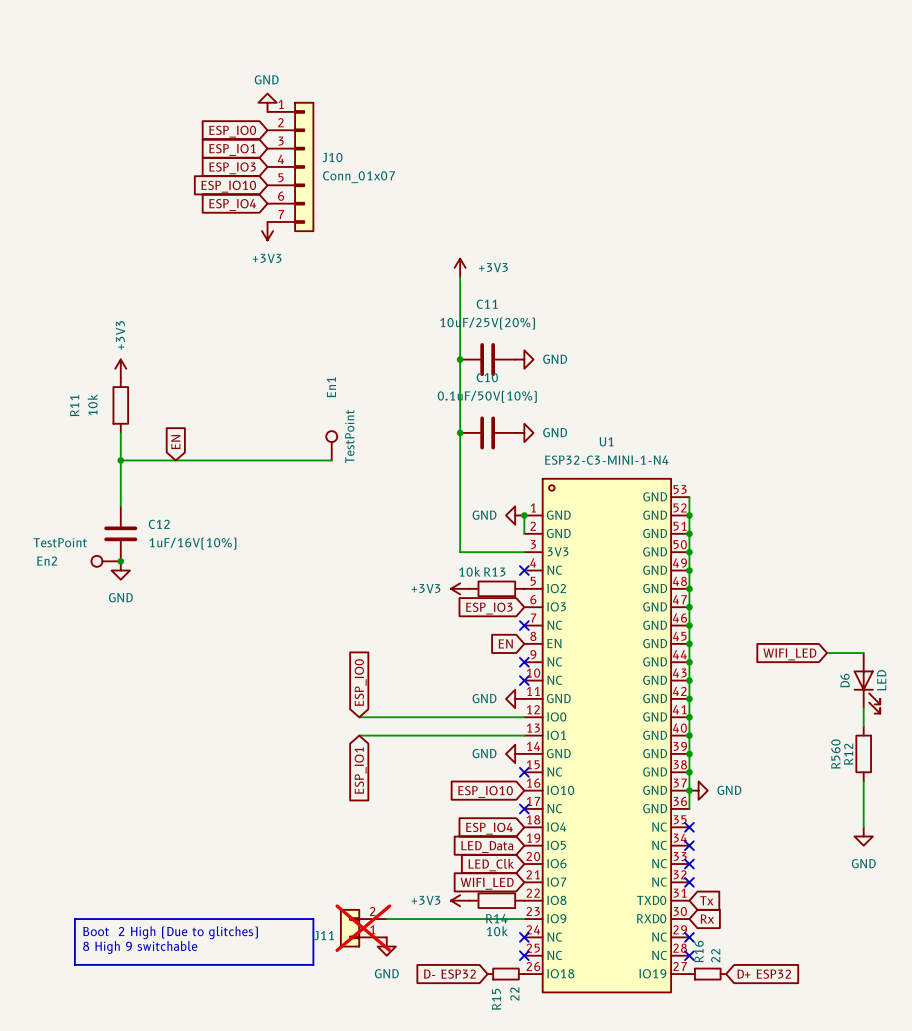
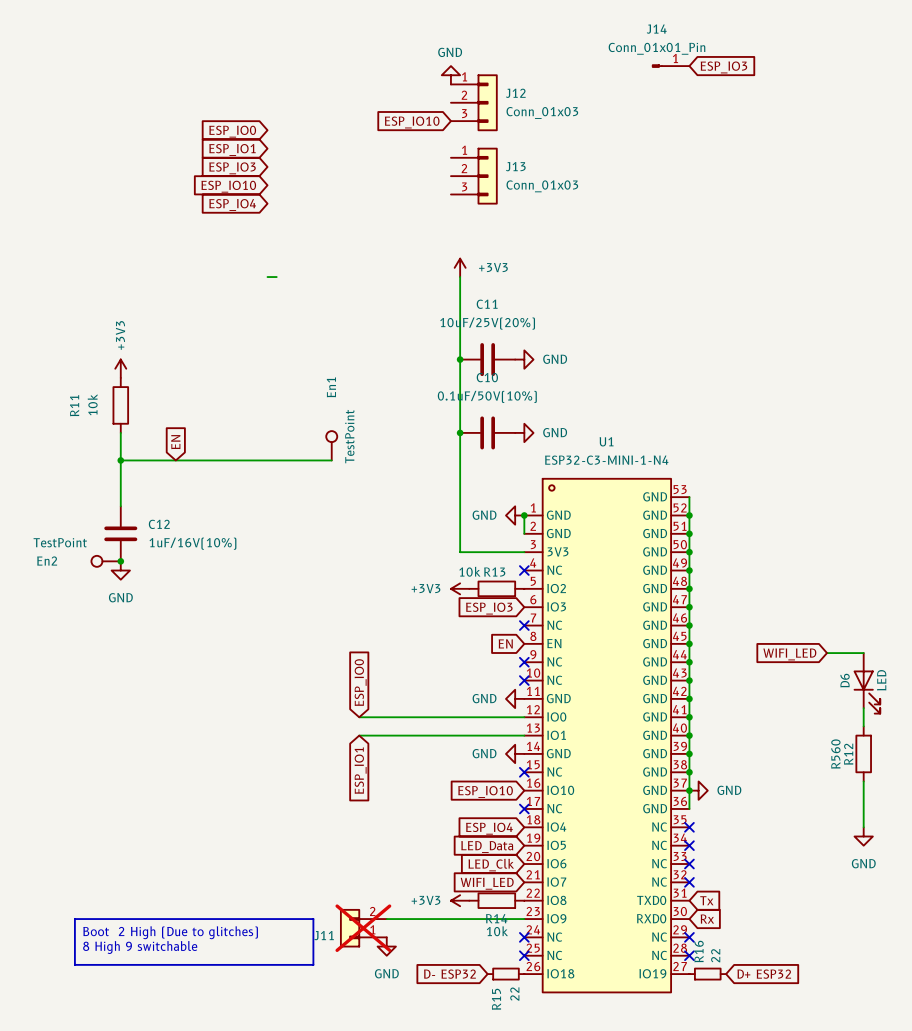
J14: none -> Conn_01x01_Pin (670, 66)
global label: none -> ESP_IO3 (723, 67)
power symbol: none -> GND (450, 75)
power symbol: GND (267, 102) -> none
J12: none -> Conn_01x03 (474, 102)
global label: none -> ESP_IO10 (412, 122)
J10: Conn_01x07 (290, 166) -> none
J13: none -> Conn_01x03 (474, 176)
power symbol: +3V3 (267, 231) -> none
wire: none -> (267, 277) (276, 277)

